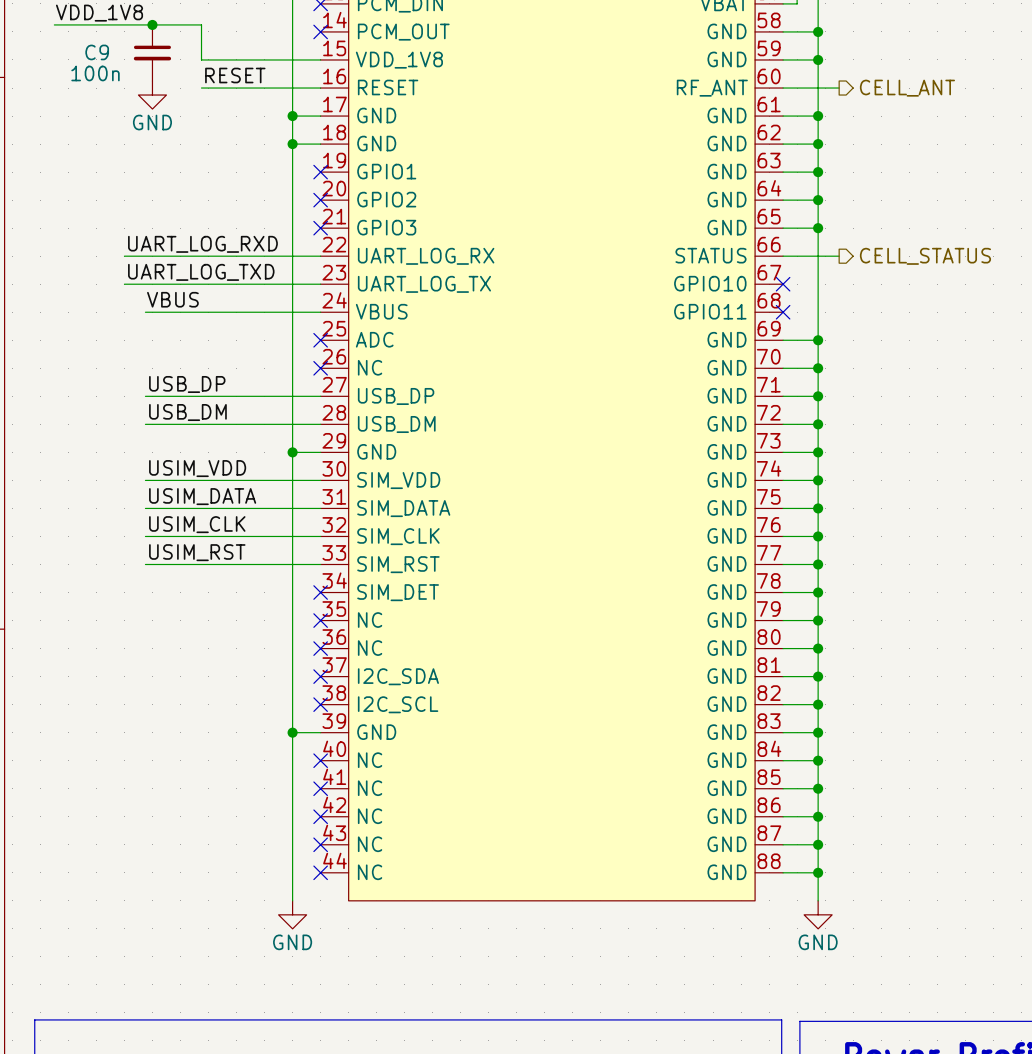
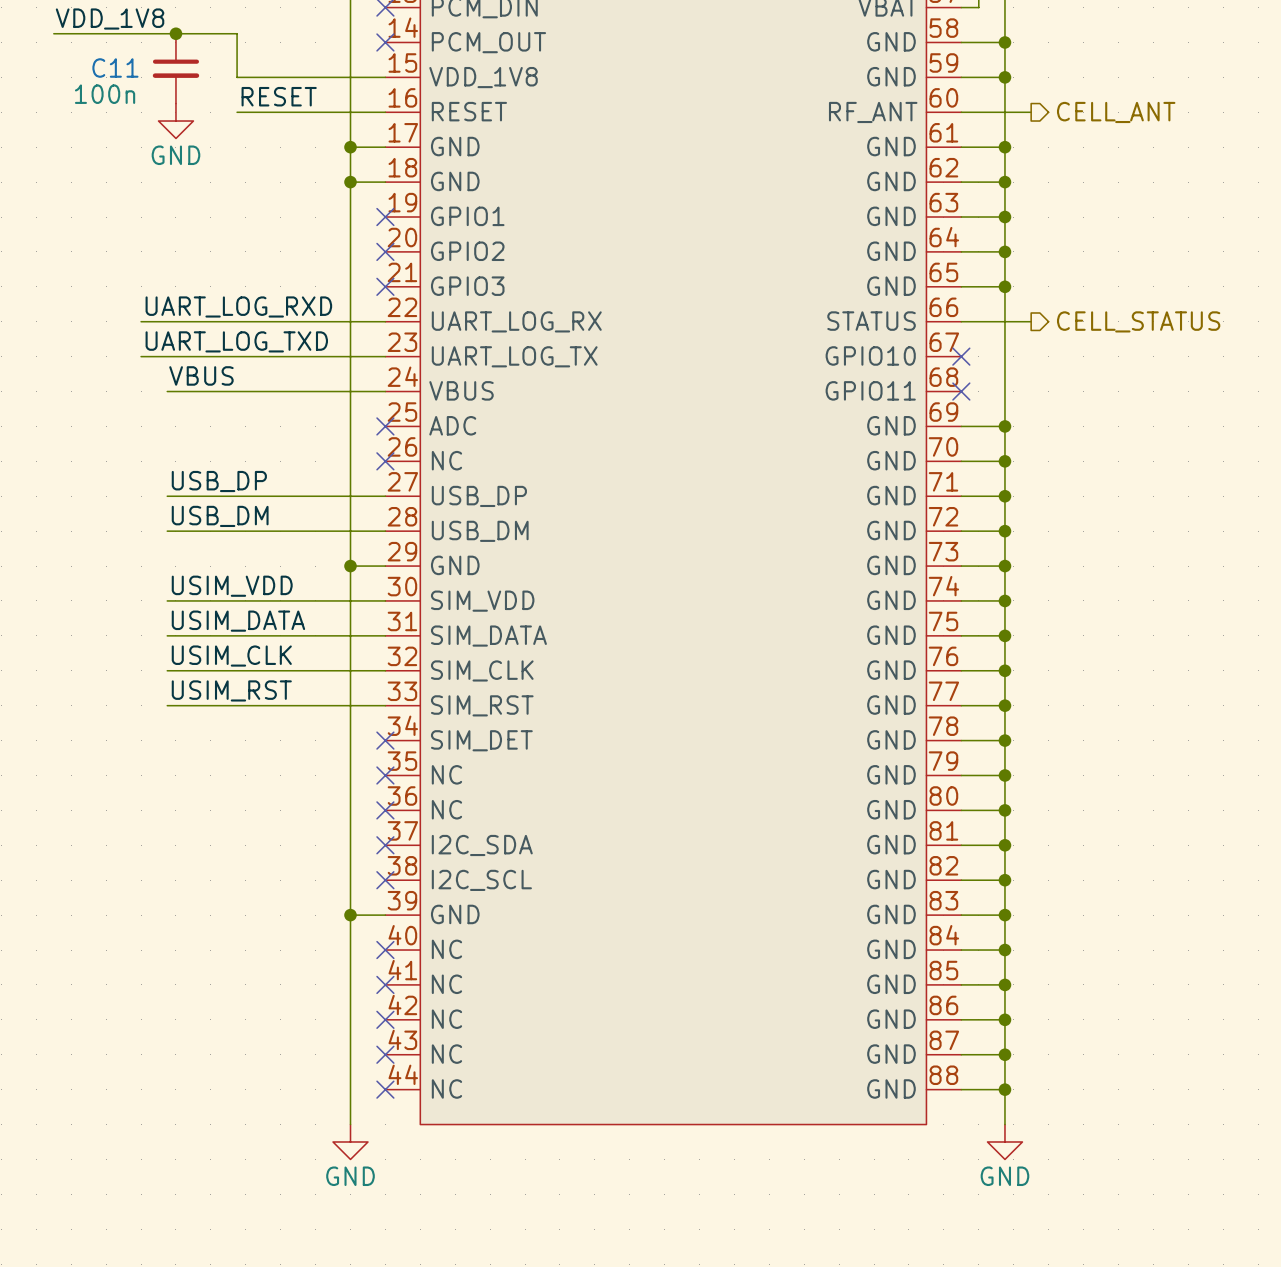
C9 name: C9 (97, 52) -> C11 (115, 68)

